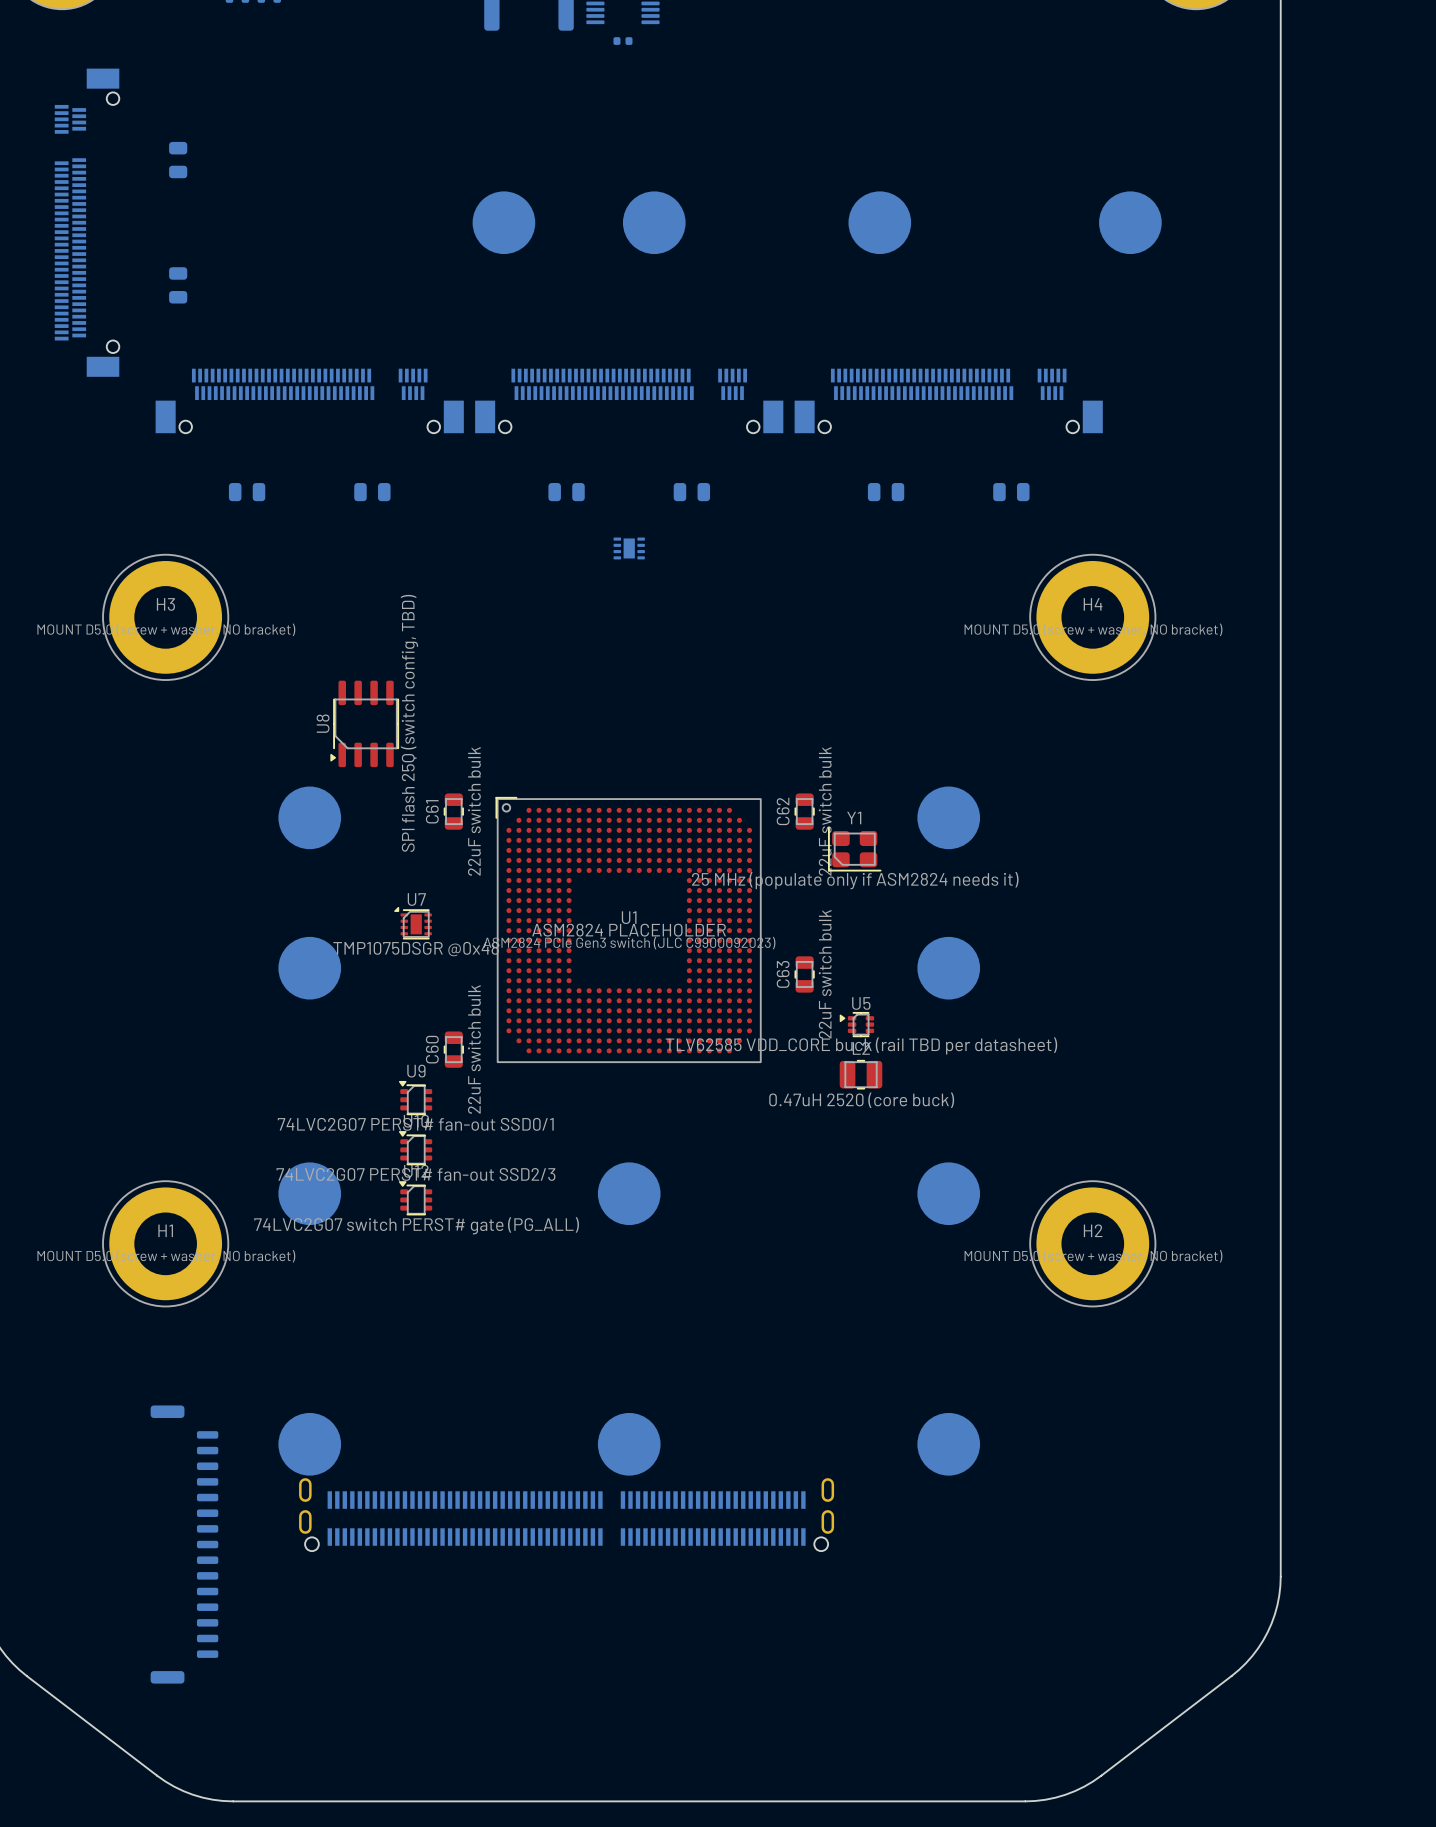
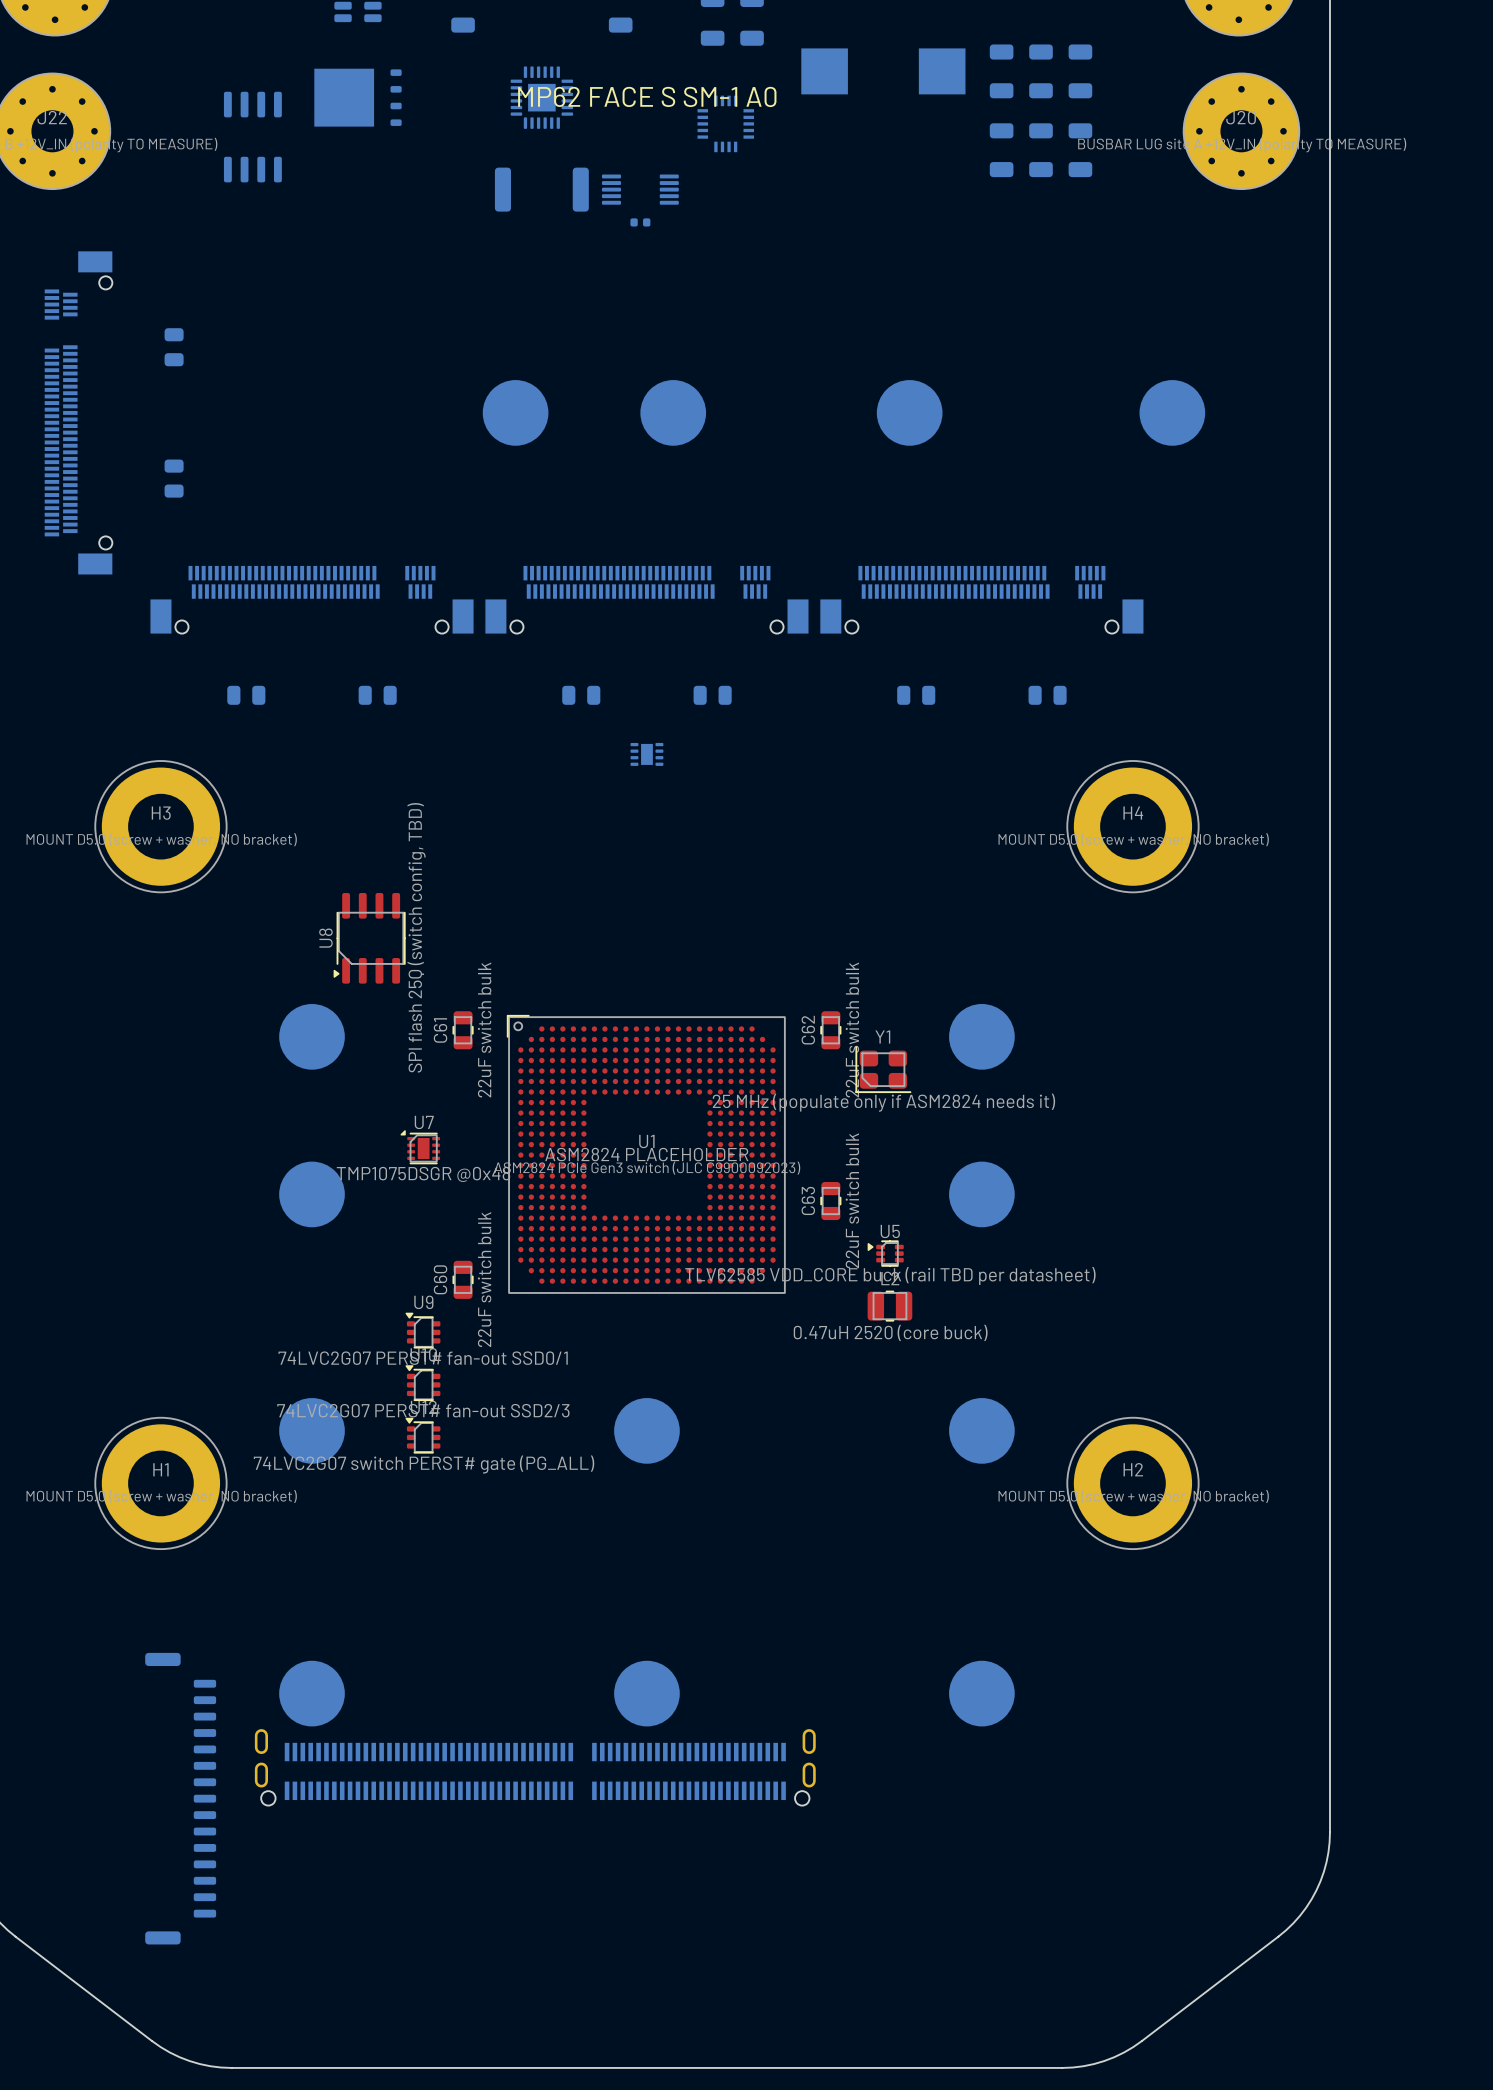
part position: (566, 1514) -> (535, 1767)

